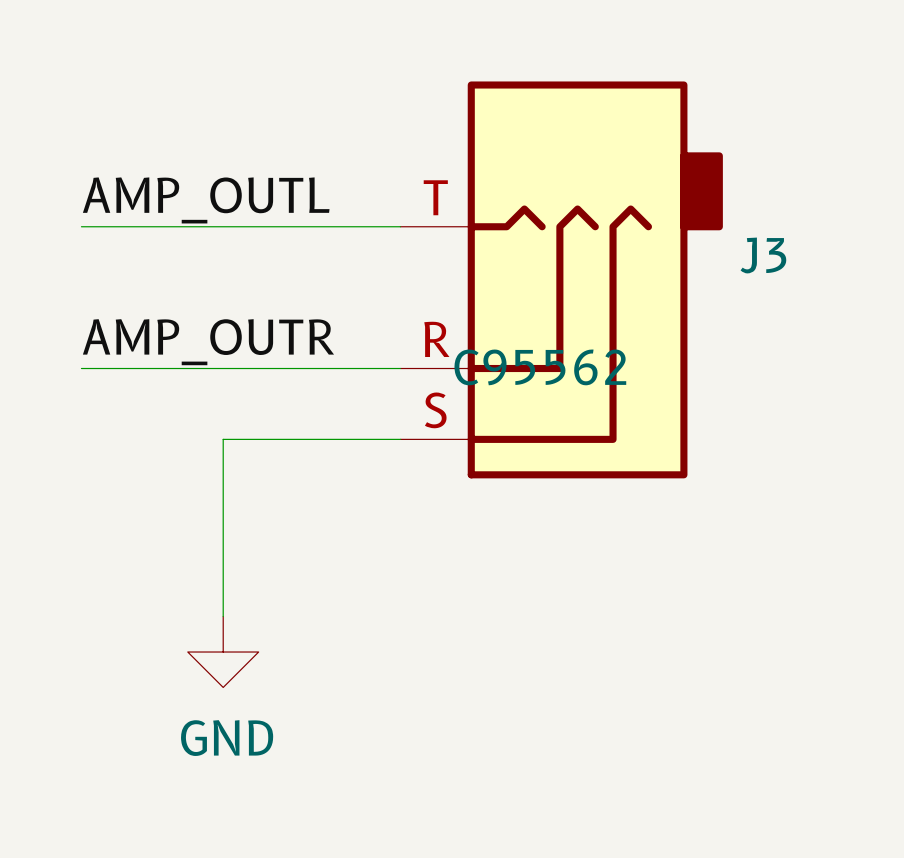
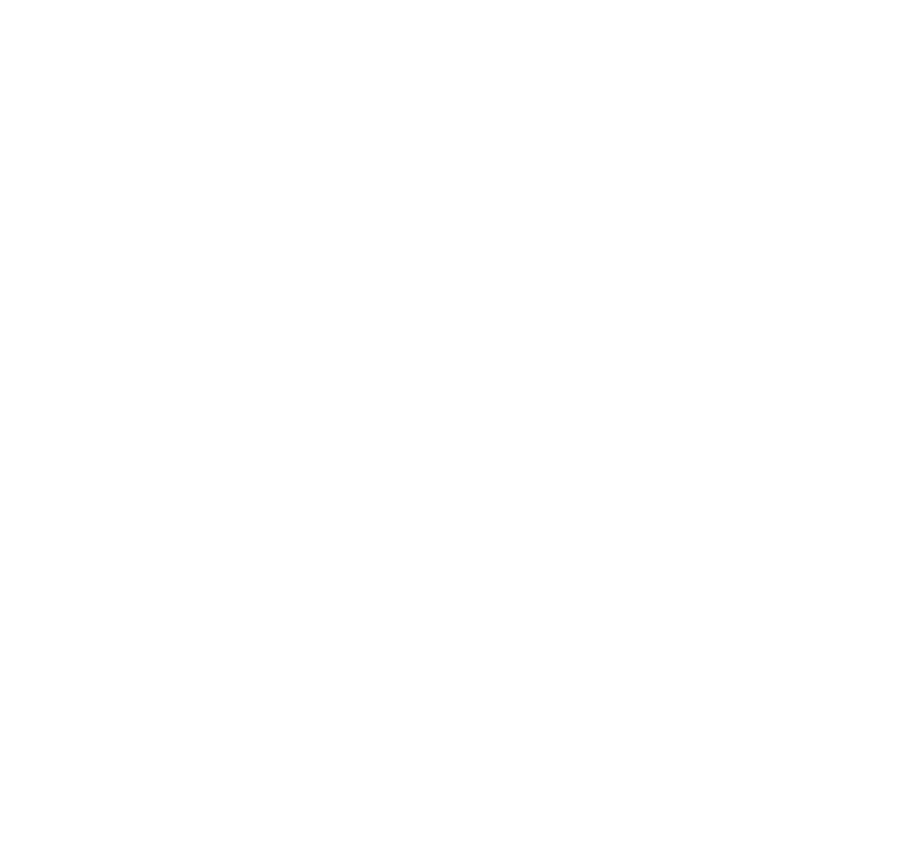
label: AMP_OUTL (206, 200) -> none
wire: (81, 226) (400, 226) -> none
J3: (561, 279) -> none
label: AMP_OUTR (208, 342) -> none
wire: (81, 368) (400, 368) -> none
wire: (400, 439) (223, 439) (223, 616) -> none
power symbol: GND (223, 652) -> none

